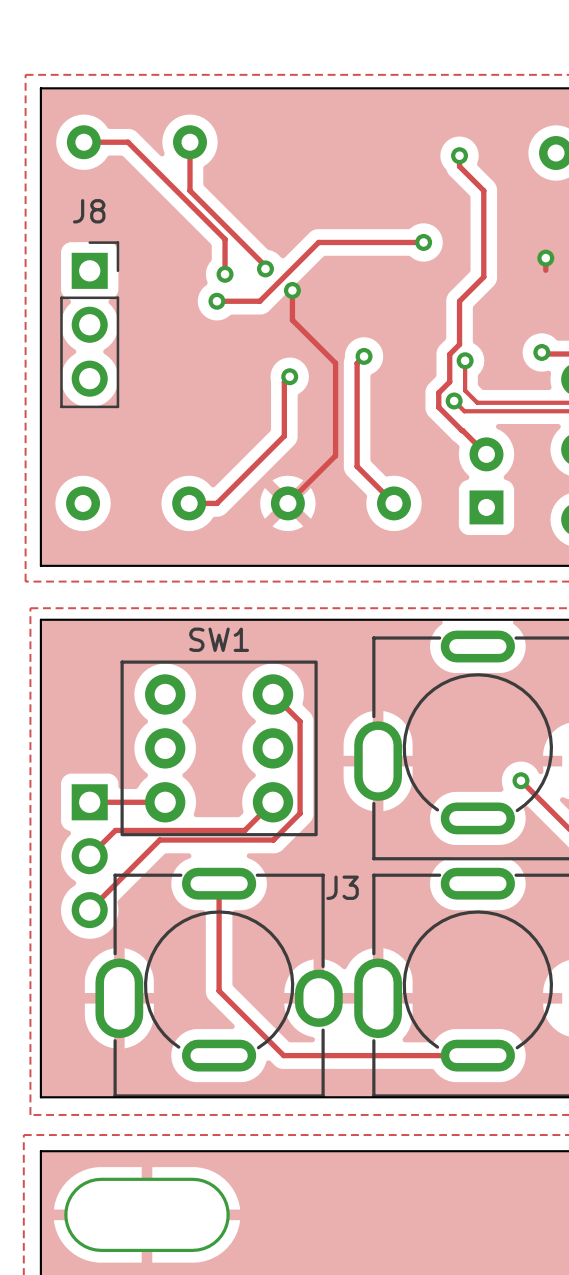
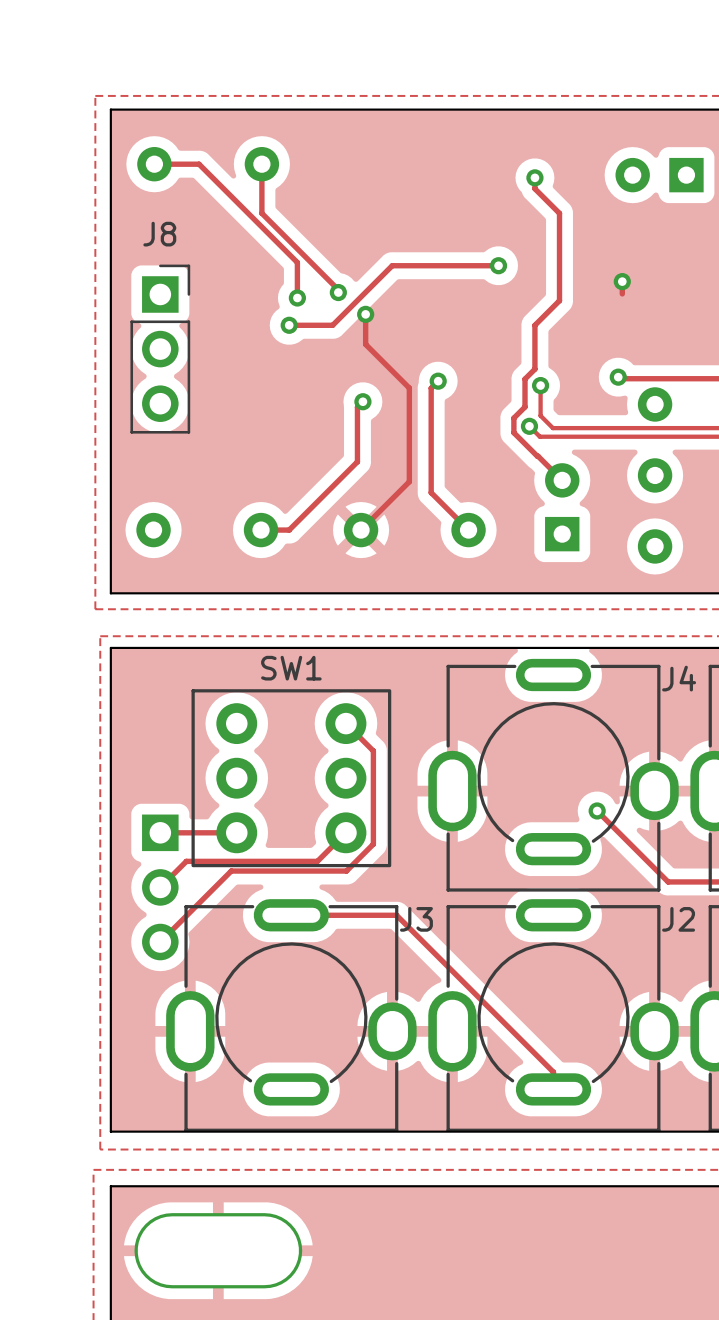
track: (219, 883) (219, 990) (283, 1055) (477, 1055) -> (291, 915) (396, 915) (553, 1072) (553, 1089)

